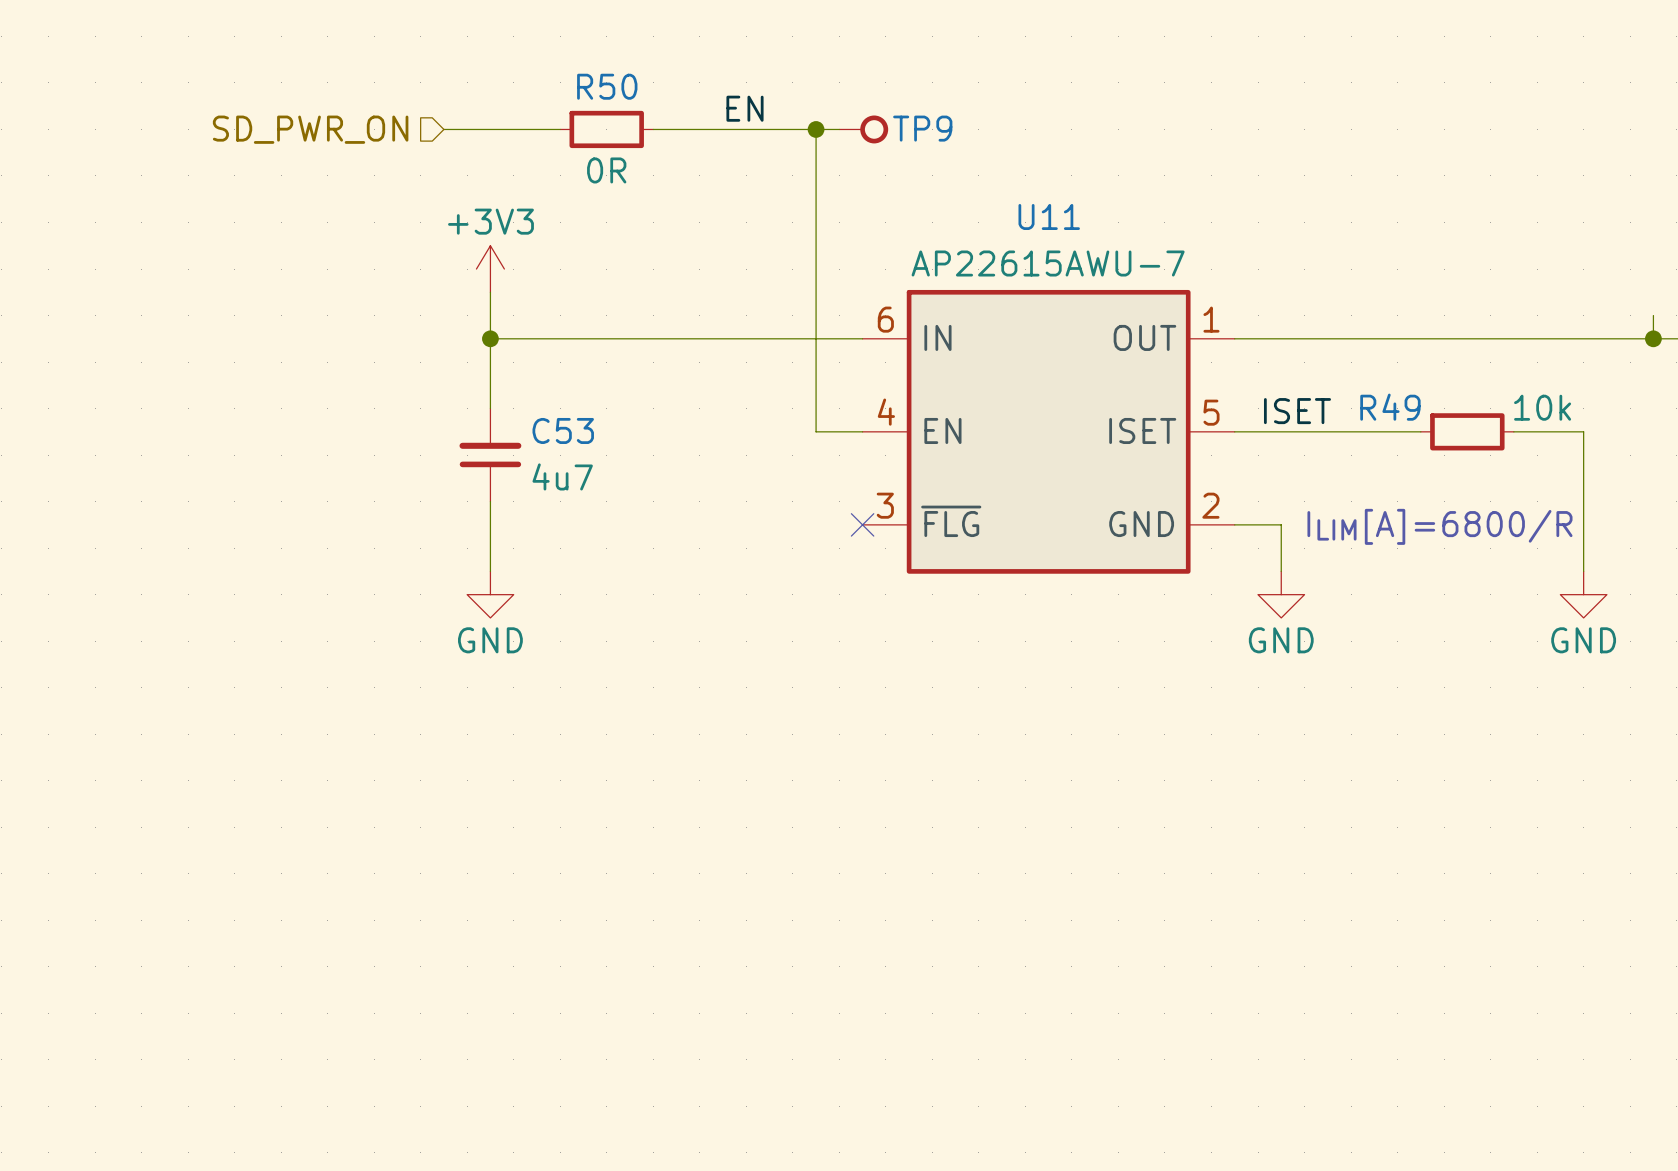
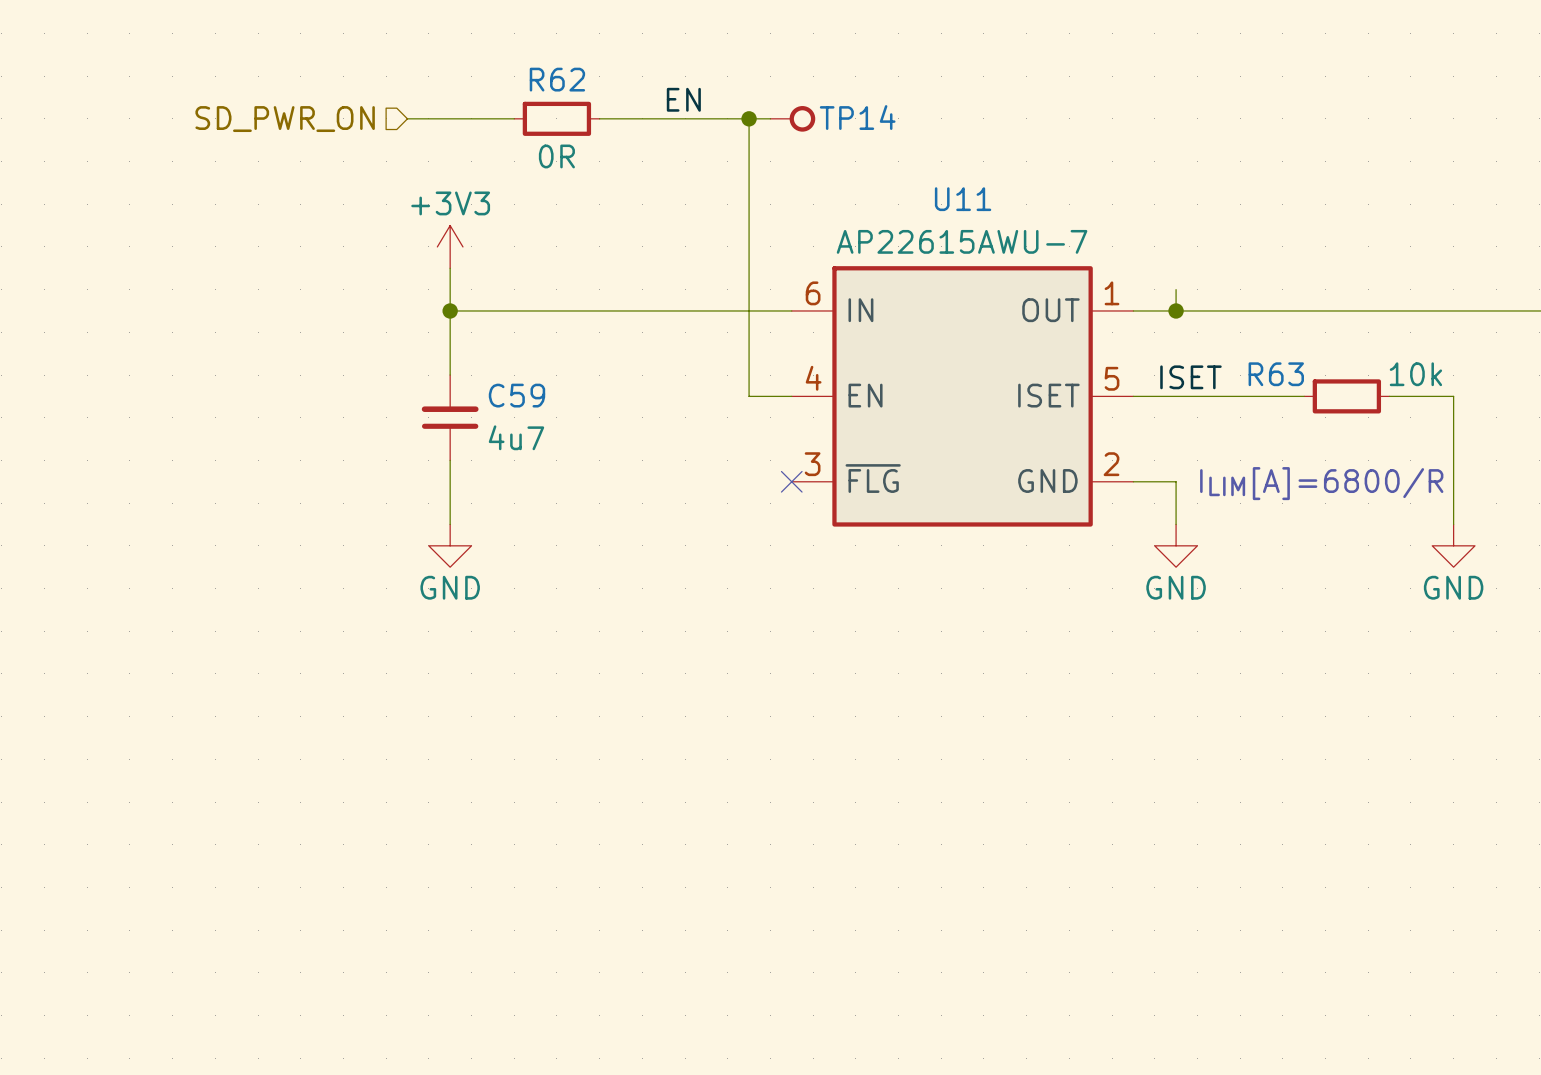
R50 name: R50 (607, 86) -> R62 (557, 79)
TP9 name: TP9 (922, 128) -> TP14 (857, 117)
wire: (1653, 315) (1653, 338) -> (1176, 289) (1176, 310)
junction: none -> (1176, 310)
junction: (1653, 338) -> none
R49 name: R49 (1390, 407) -> R63 (1276, 374)
C53 name: C53 (563, 430) -> C59 (516, 395)

